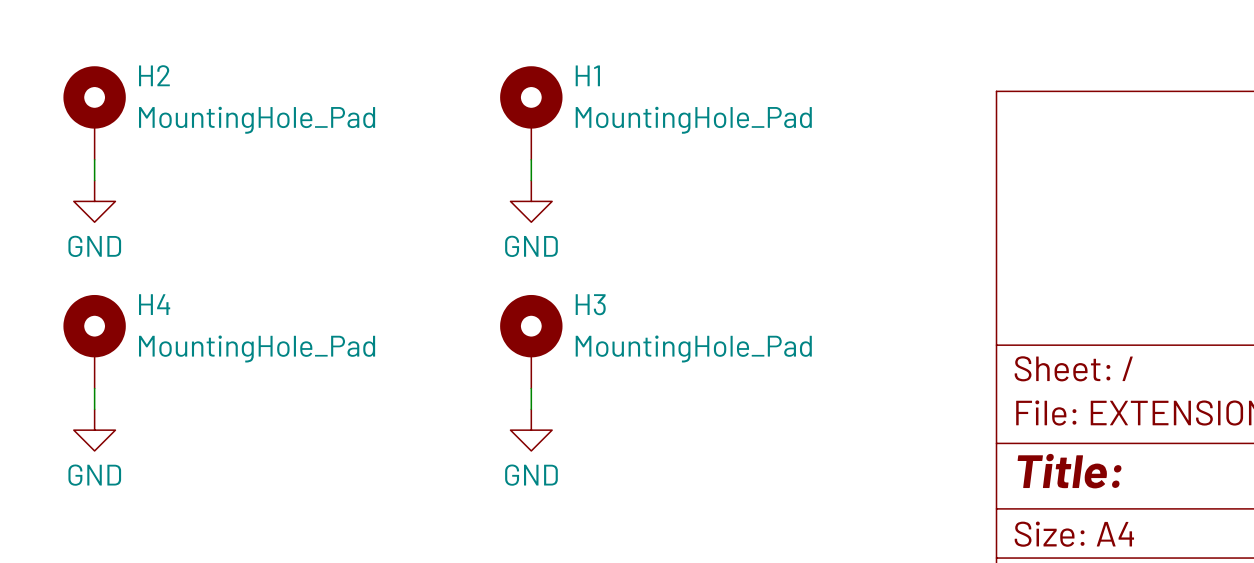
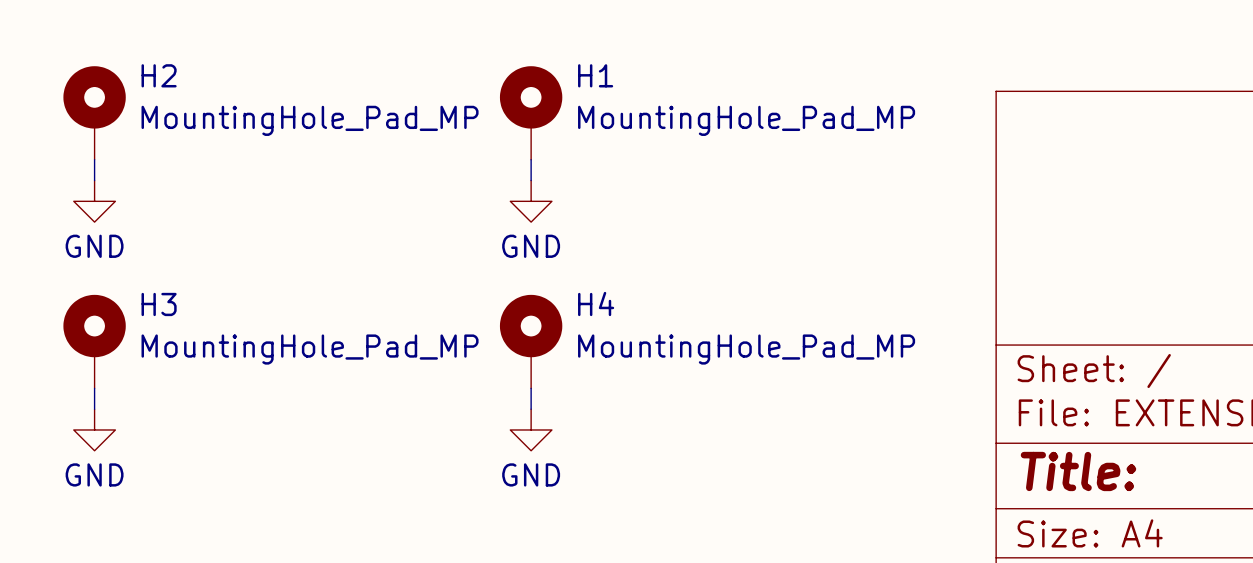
H2 value: MountingHole_Pad (257, 120) -> MountingHole_Pad_MP (310, 120)
H1 value: MountingHole_Pad (693, 120) -> MountingHole_Pad_MP (746, 120)
H4 name: H4 (154, 304) -> H3 (159, 304)
H3 name: H3 (590, 304) -> H4 (596, 303)
H4 value: MountingHole_Pad (257, 348) -> MountingHole_Pad_MP (310, 349)
H3 value: MountingHole_Pad (693, 348) -> MountingHole_Pad_MP (746, 349)

